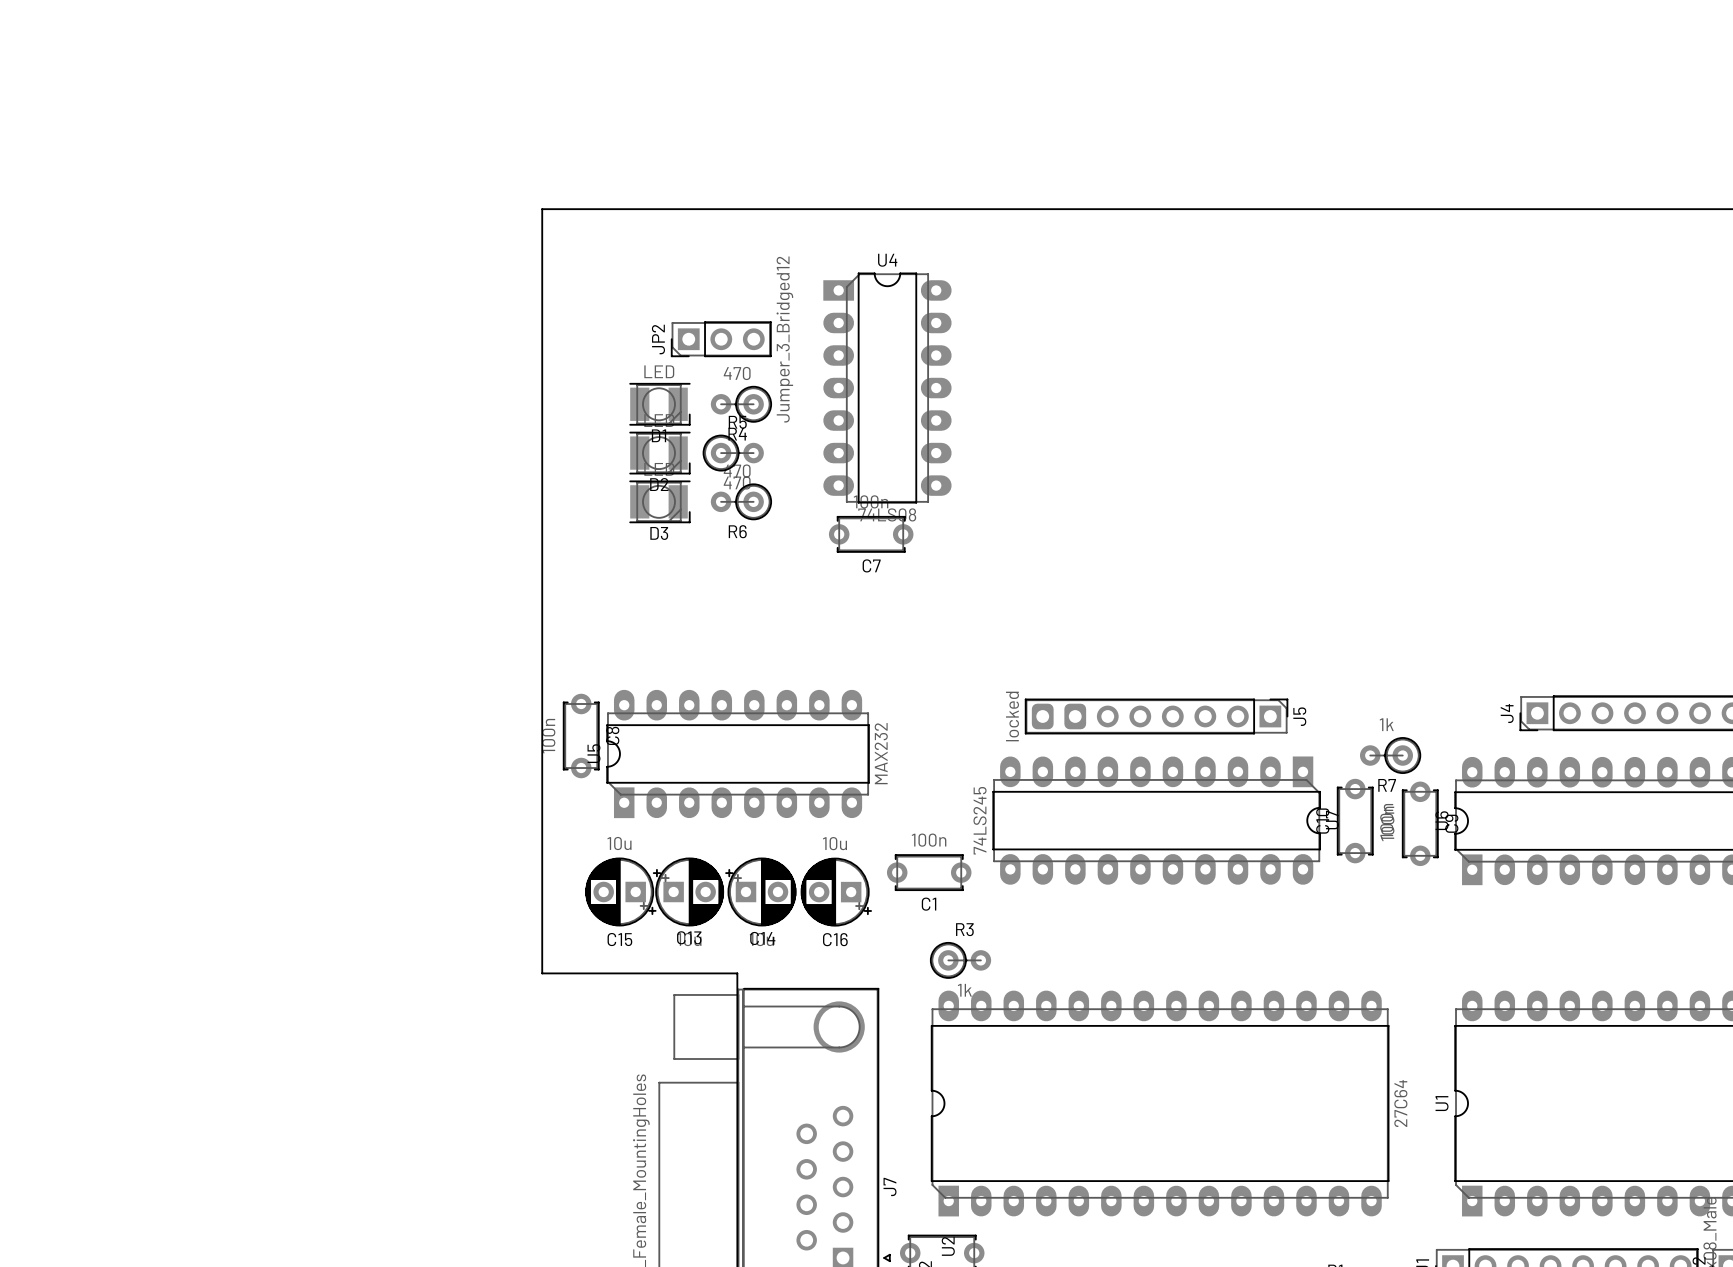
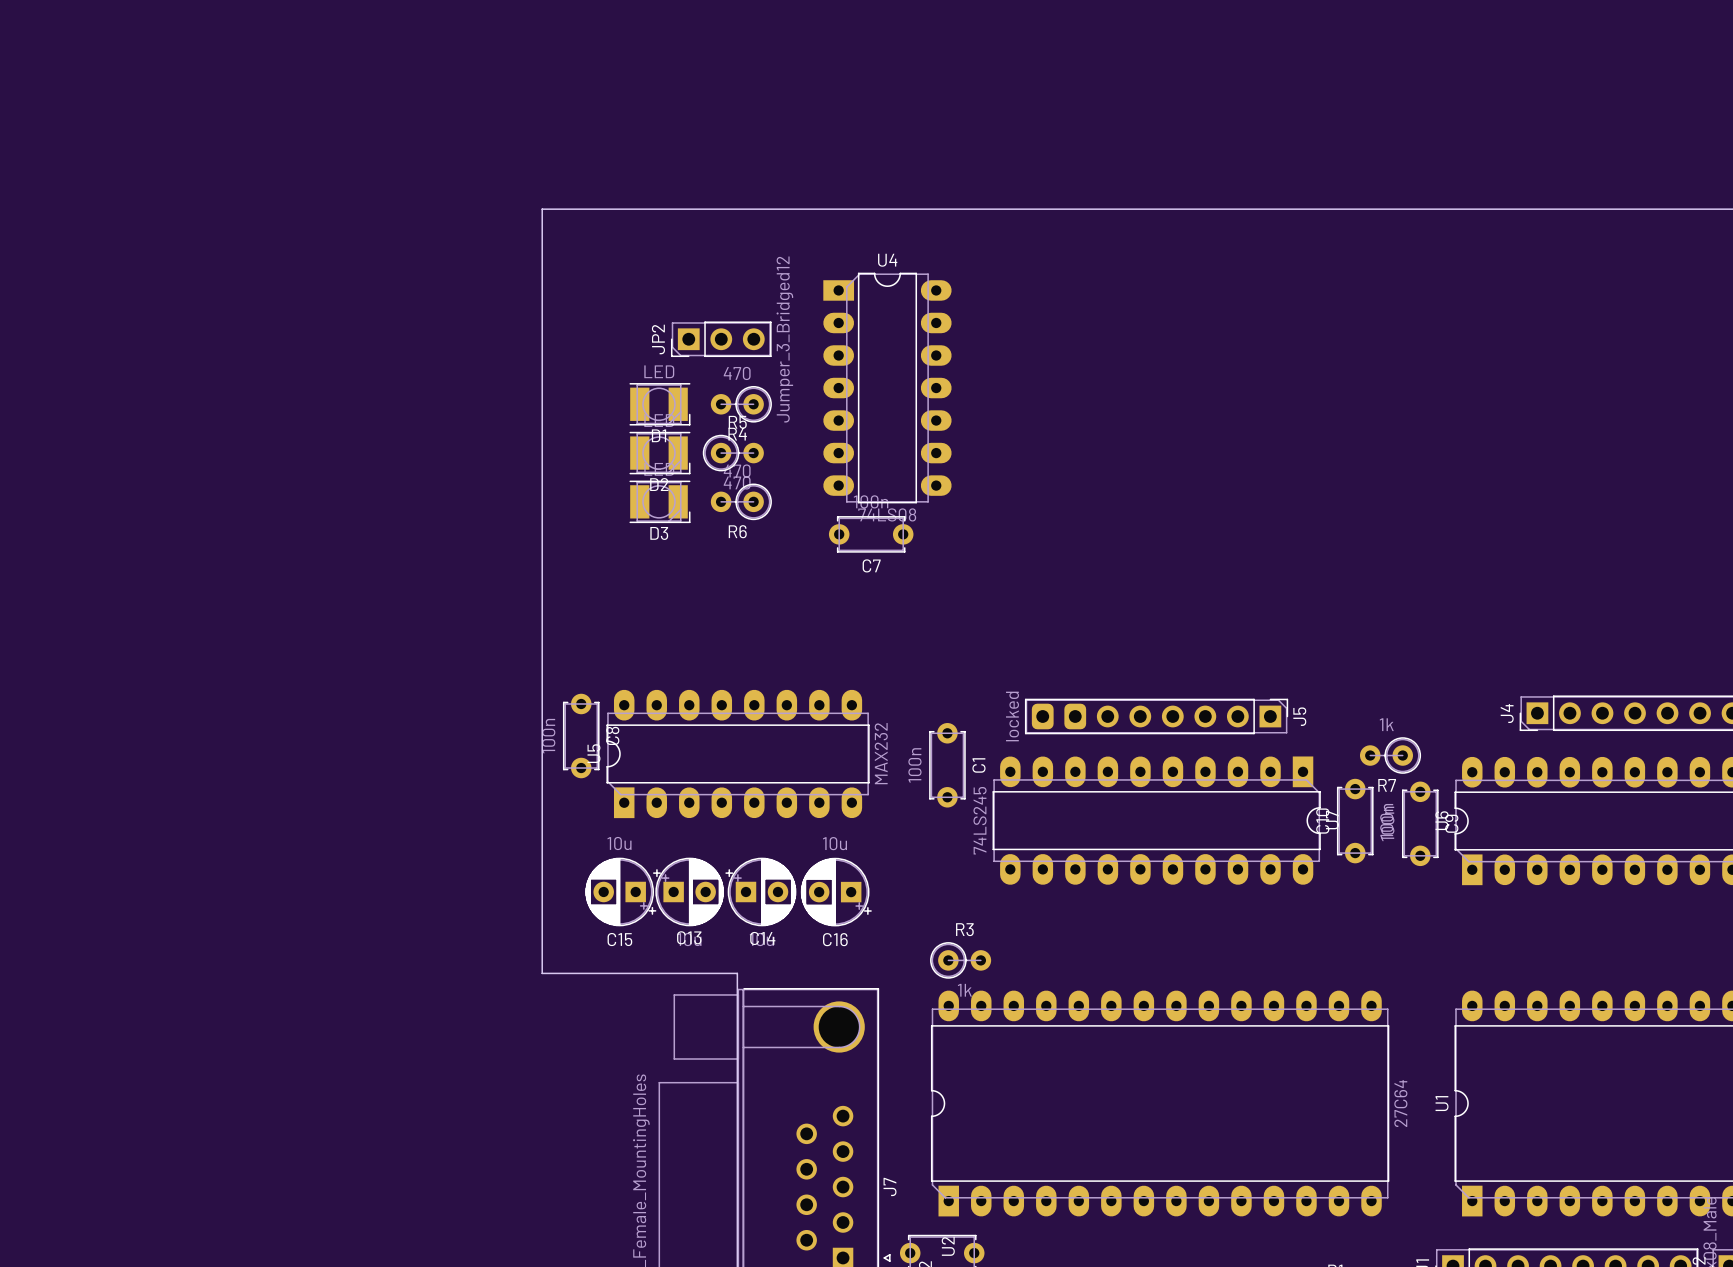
C1 value position: 100n (929, 840) -> 100n (914, 765)
C1 rotation: 0° (929, 872) -> 90° clockwise (947, 765)
C1 position: (929, 872) -> (947, 765)
C1 name position: C1 (929, 904) -> C1 (978, 765)

